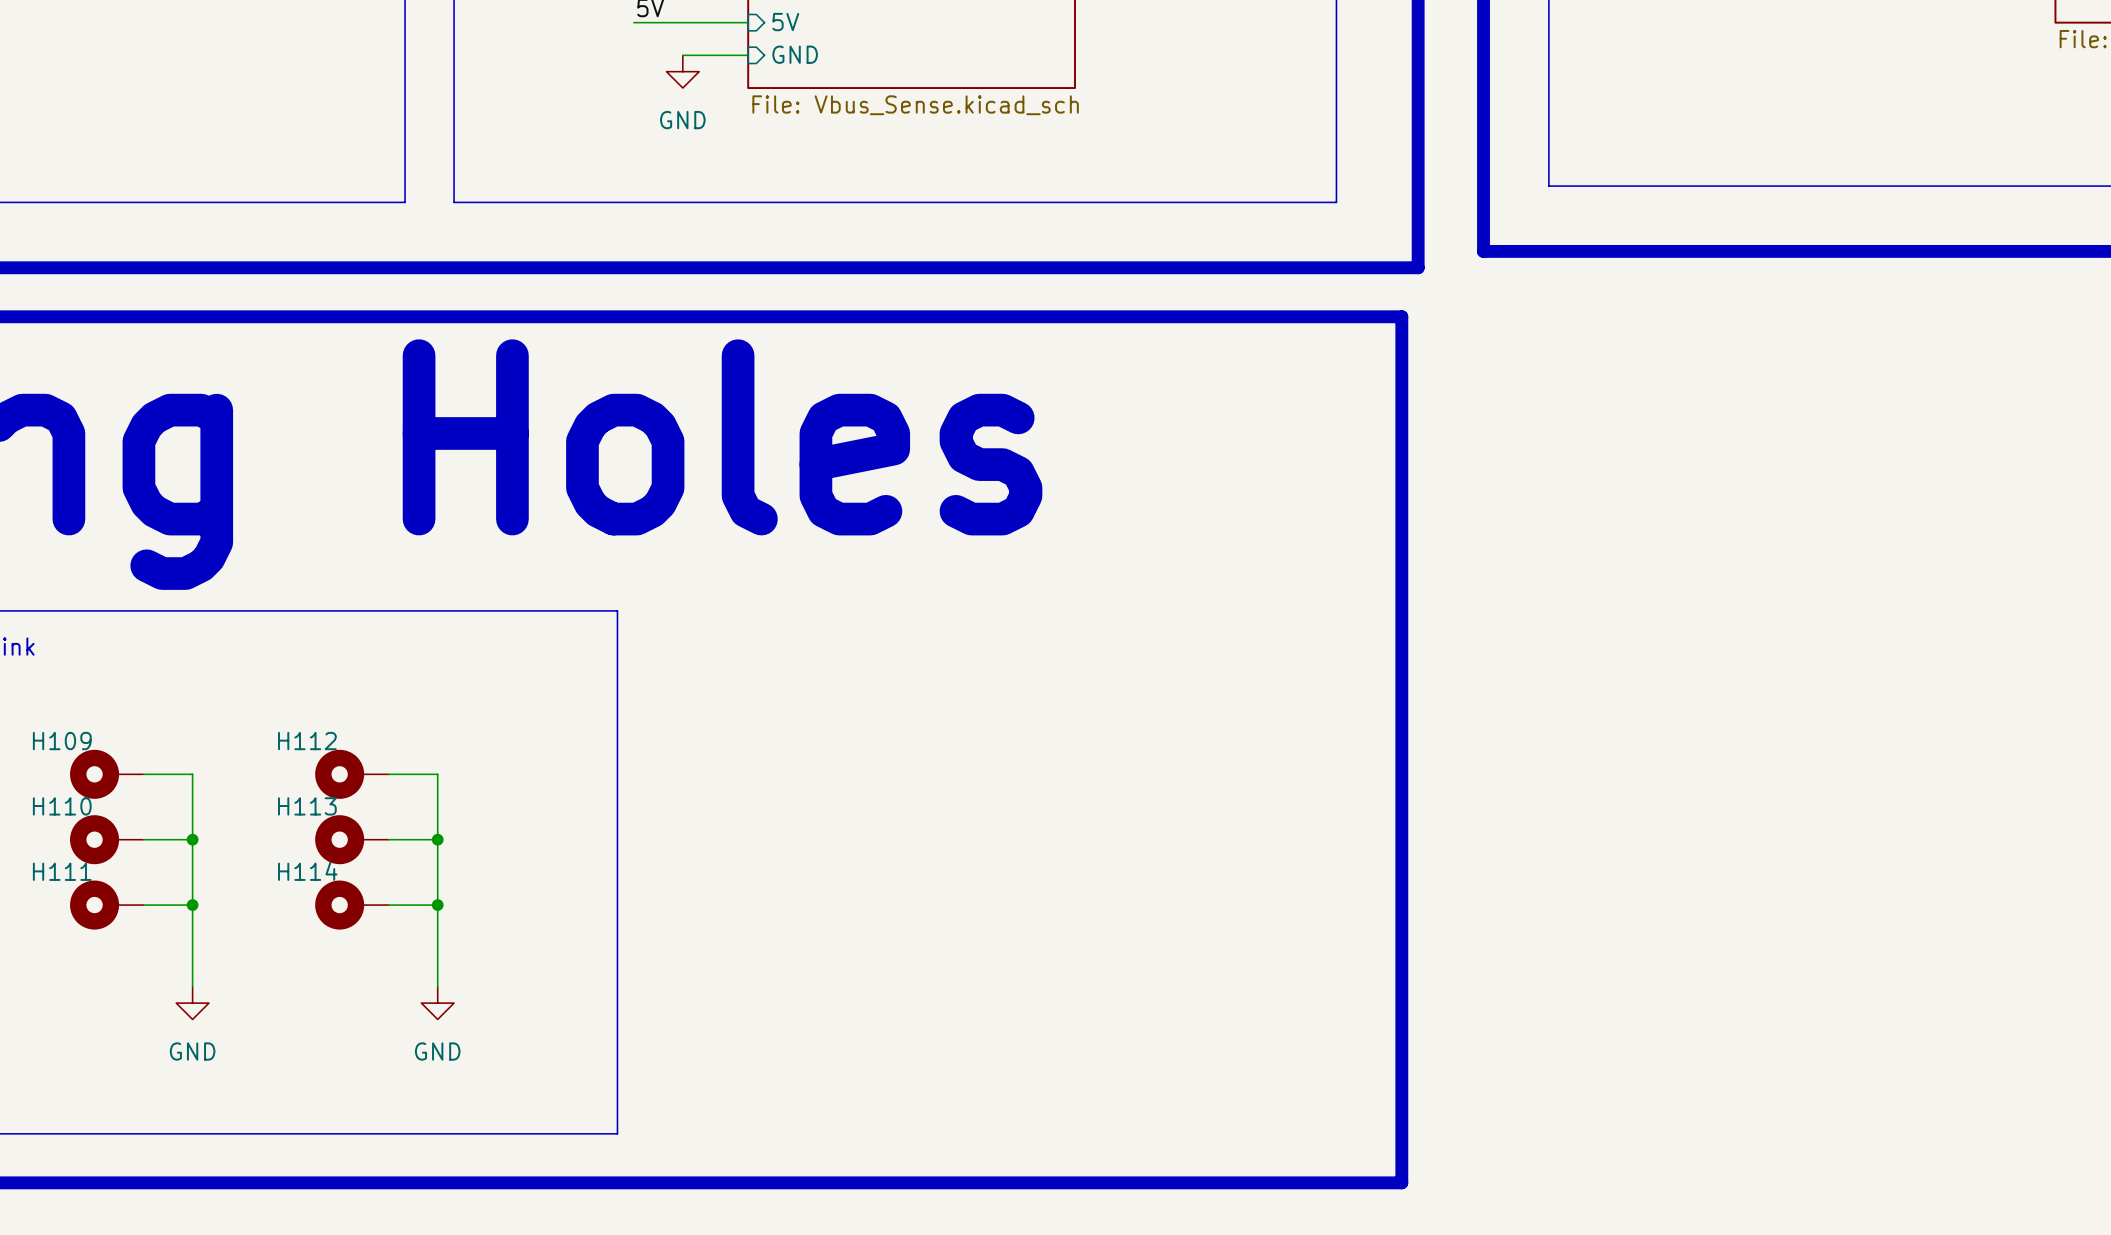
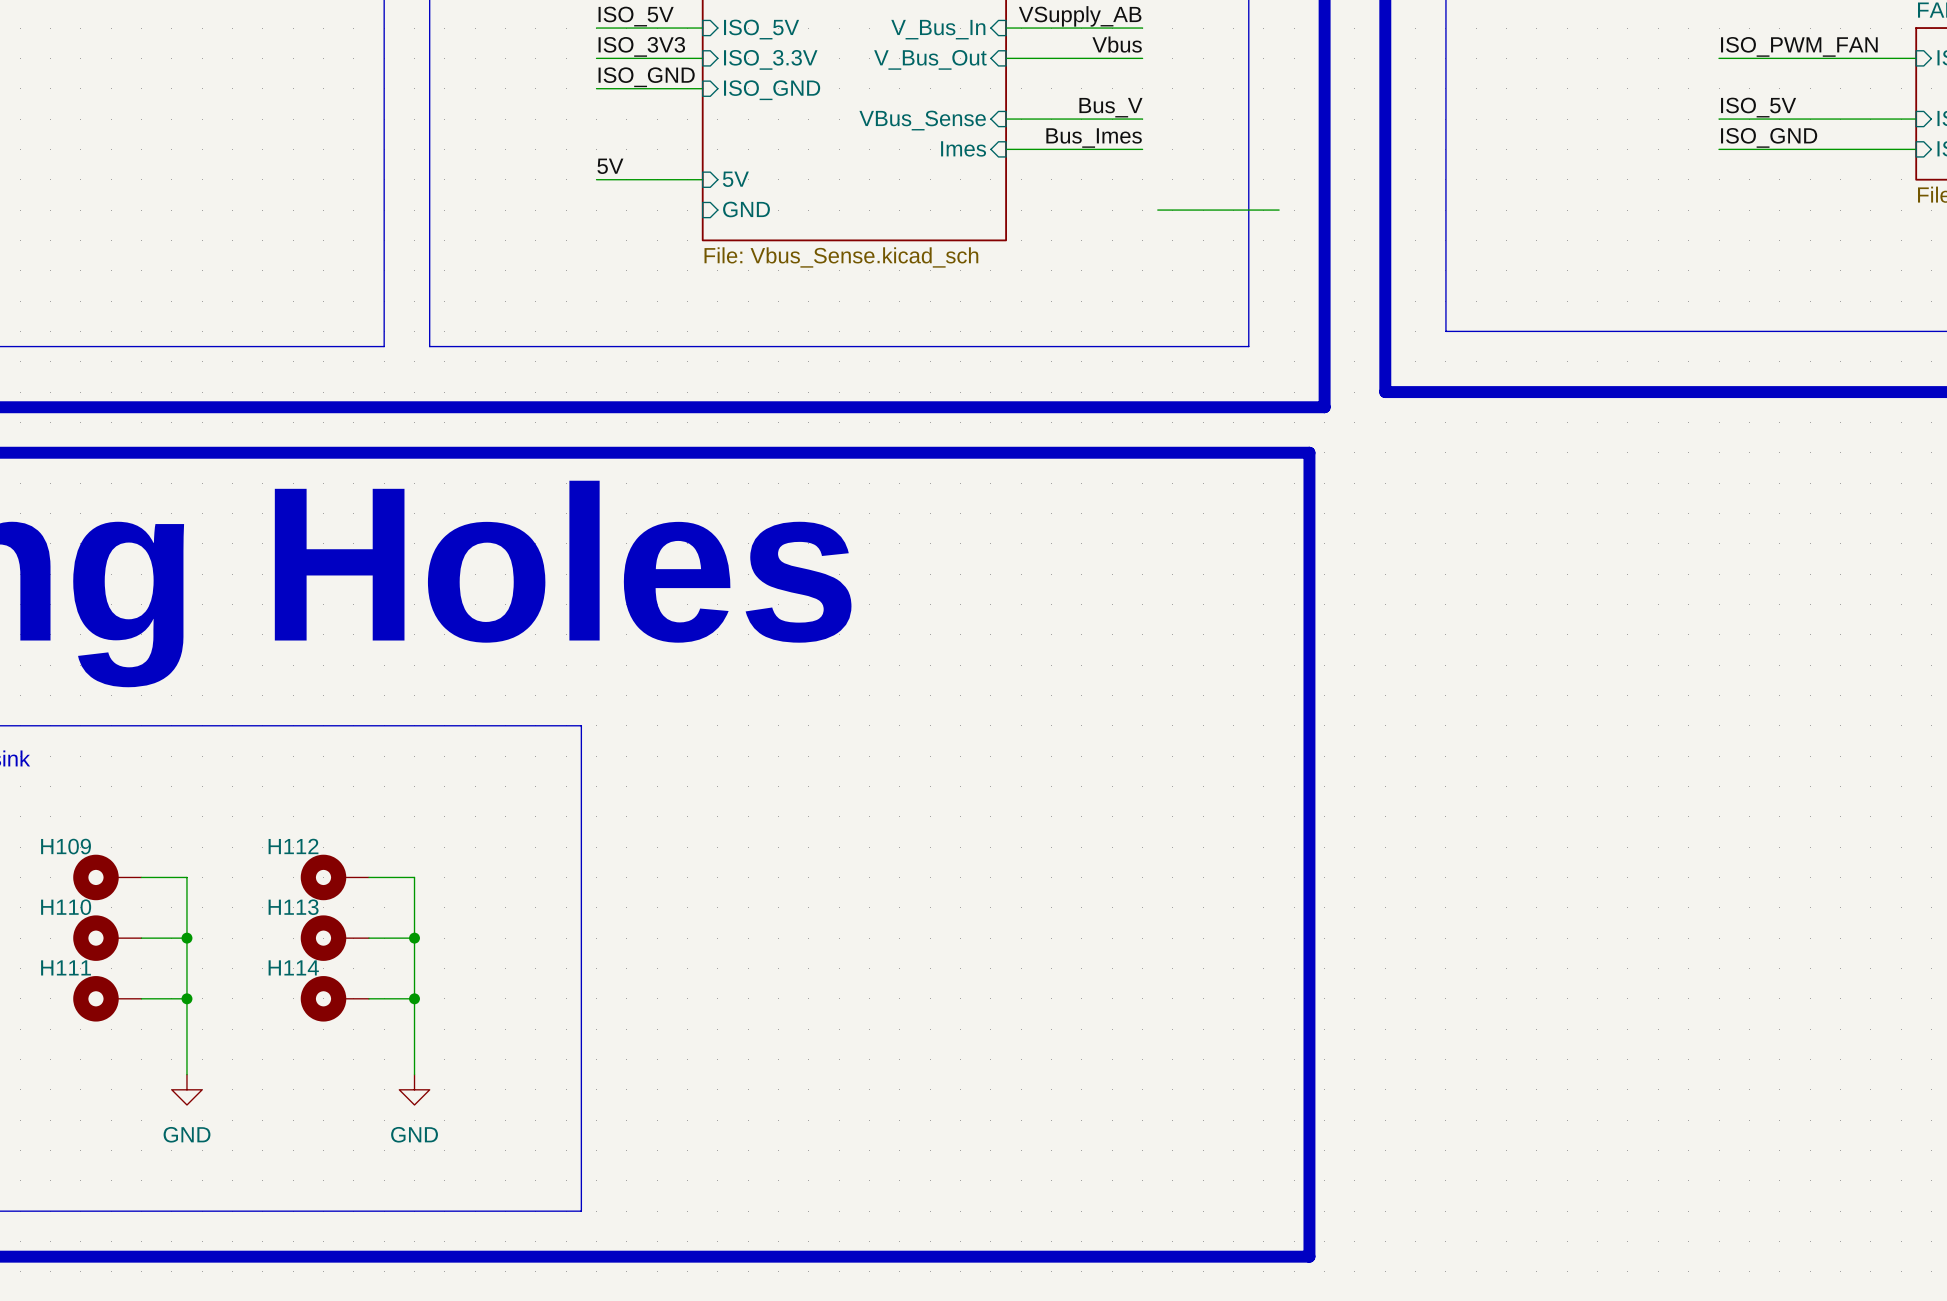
wire: (682, 55) (748, 55) -> none
wire: none -> (1157, 210) (1279, 210)
power symbol: GND (682, 71) -> none

